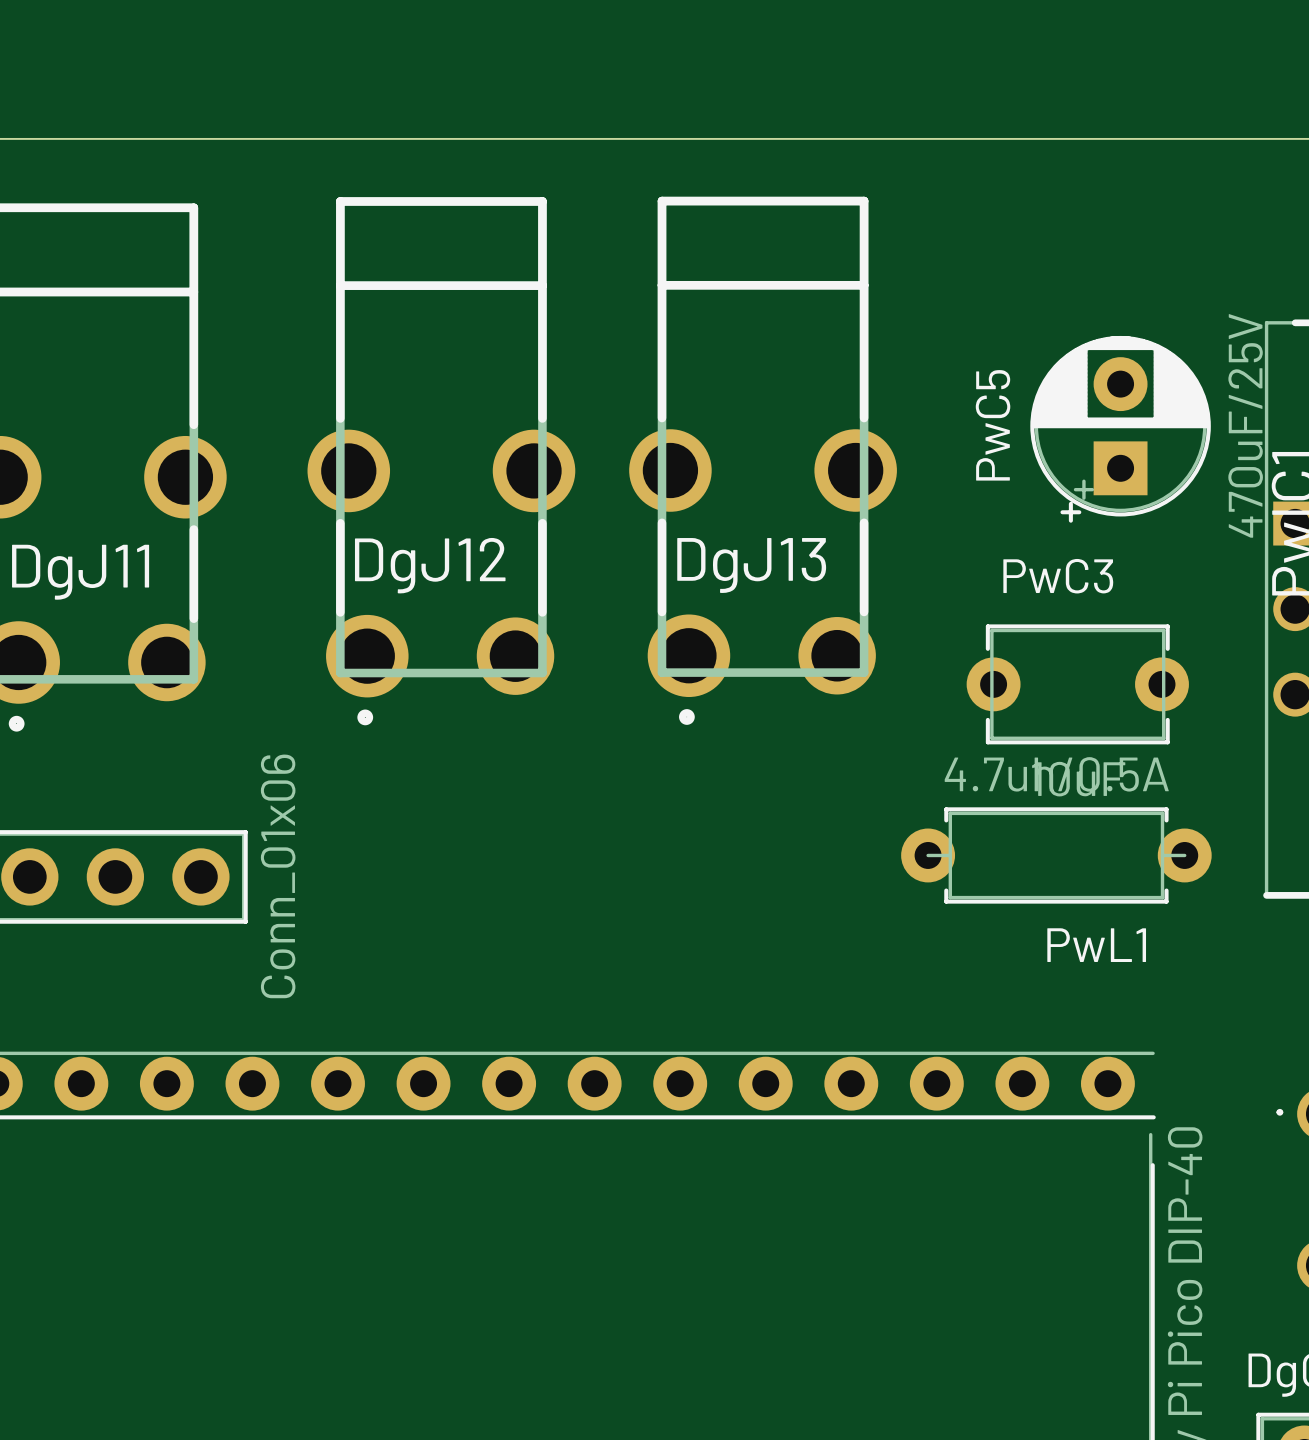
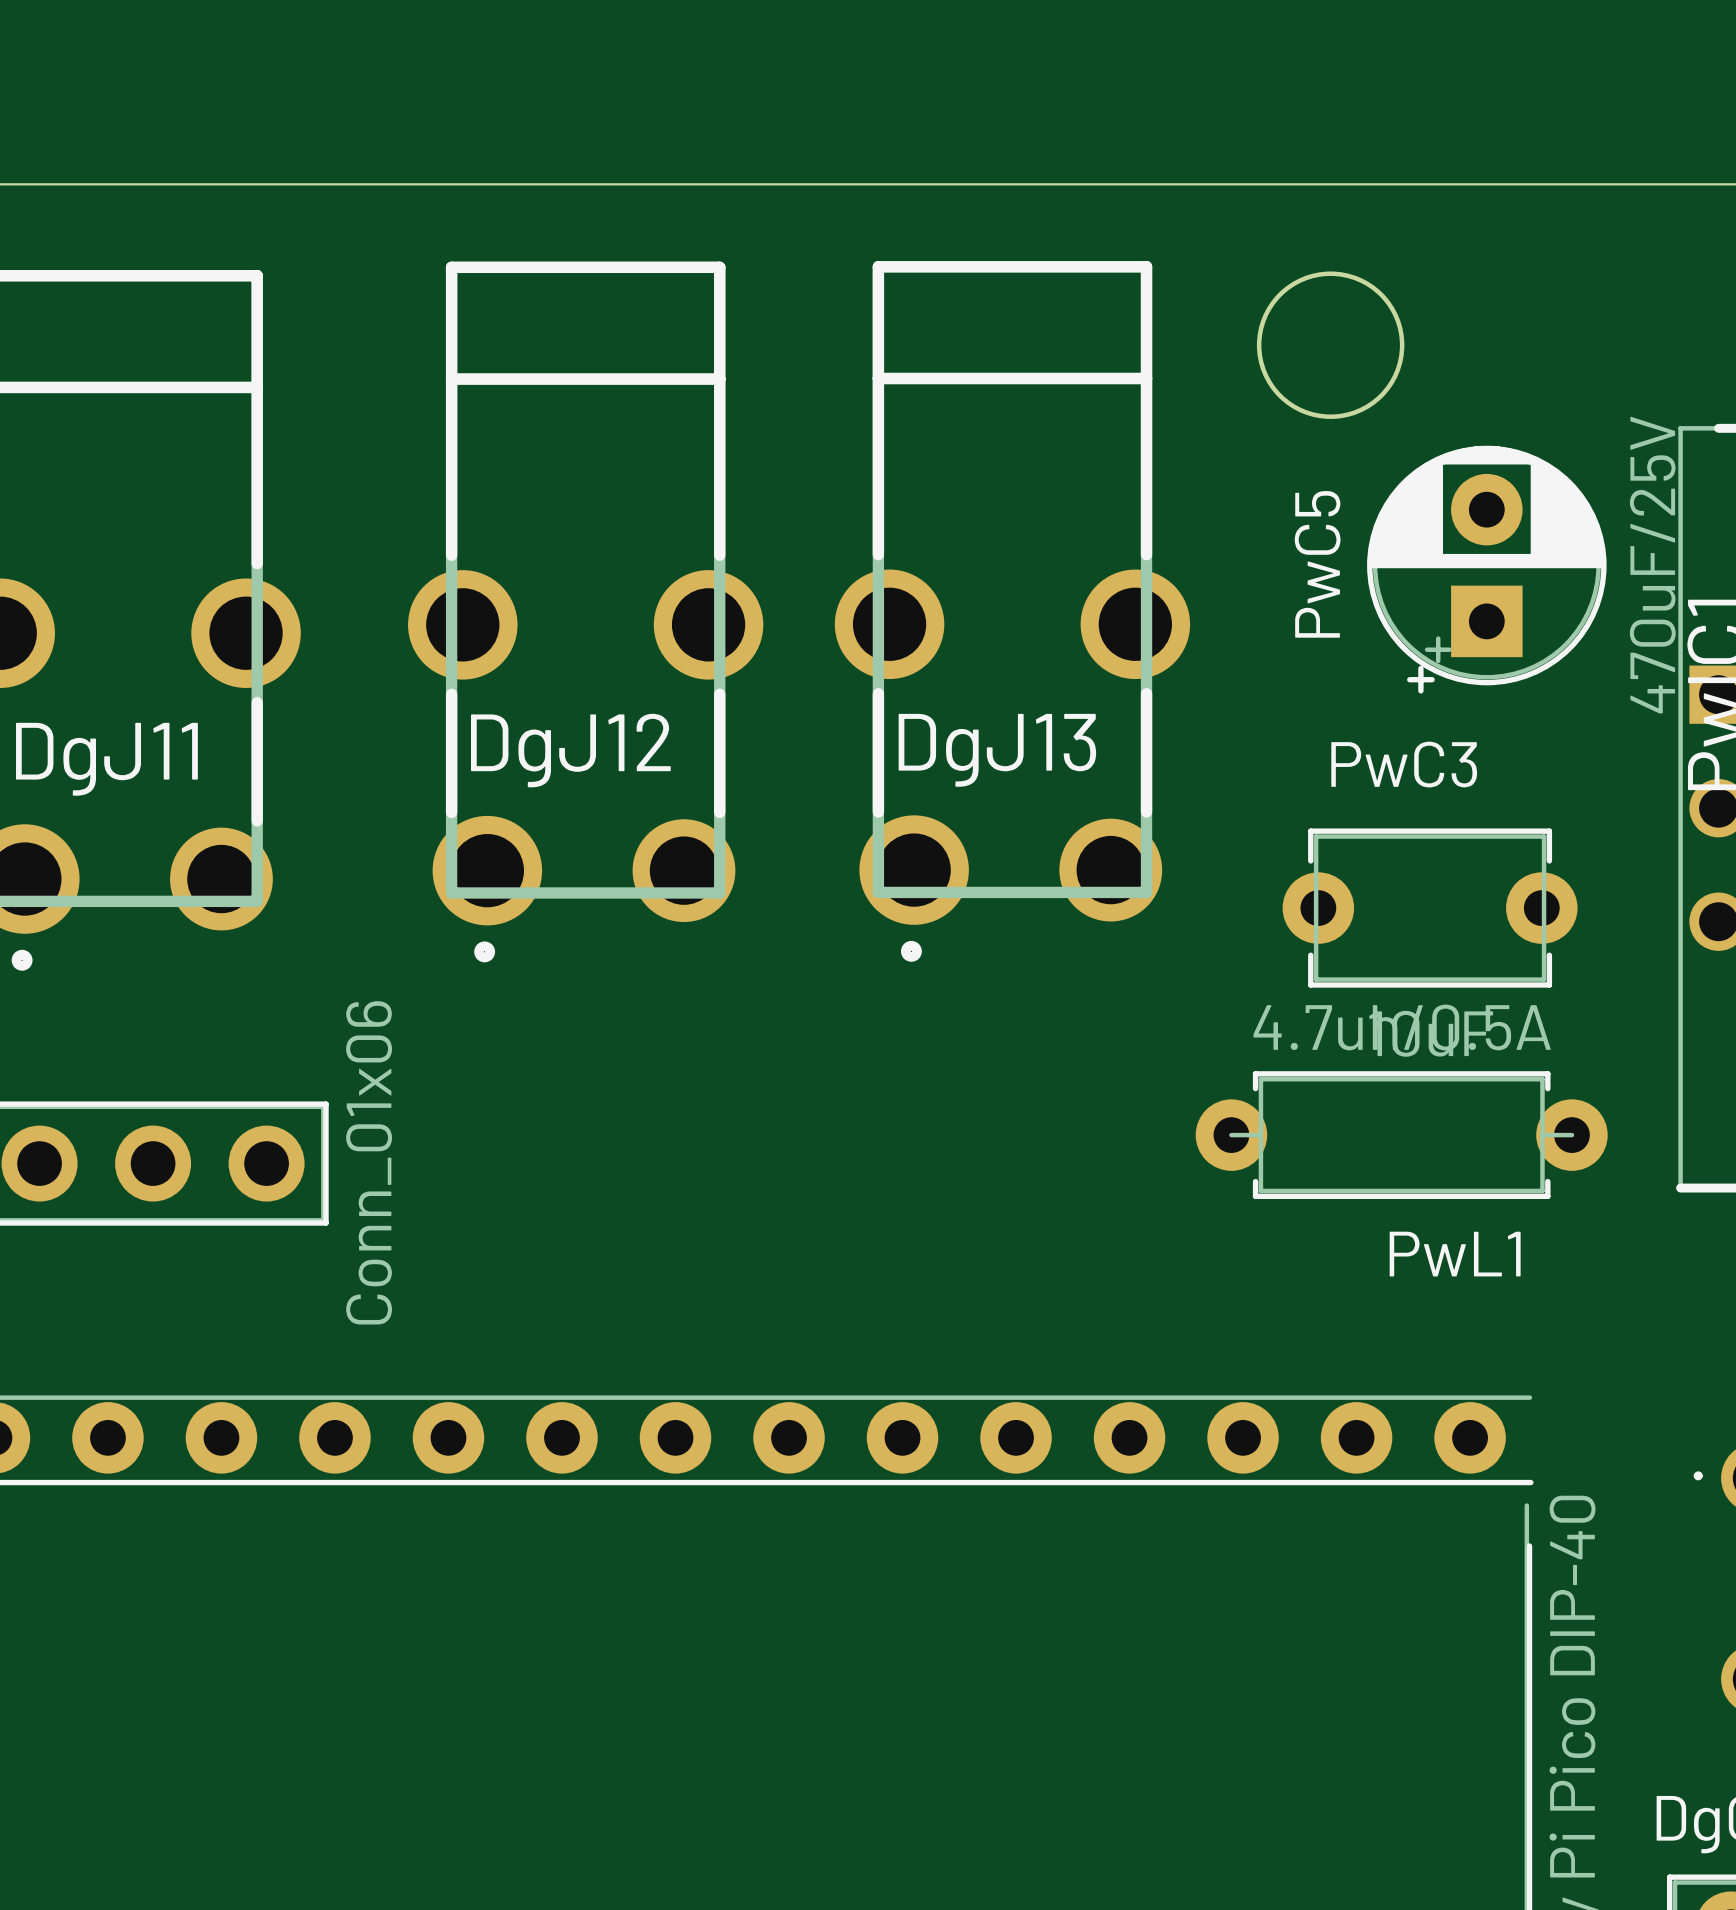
round board edge: none -> [1256, 271, 1405, 419]

